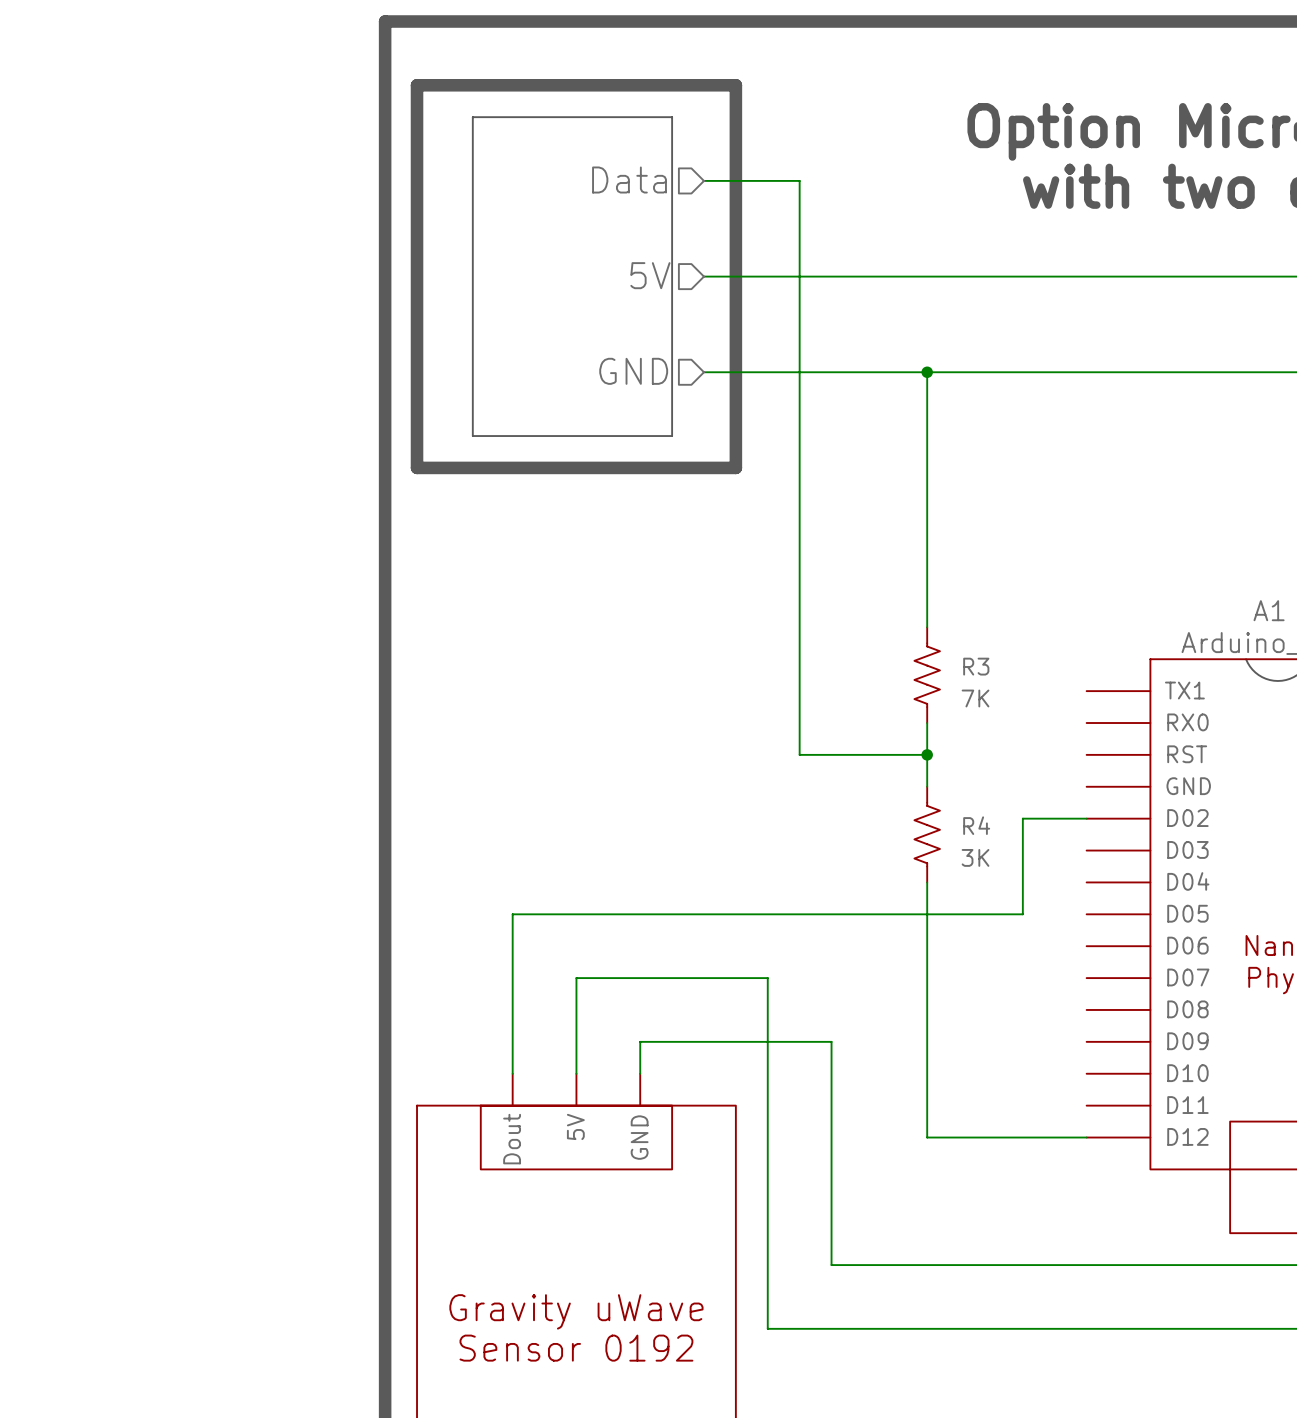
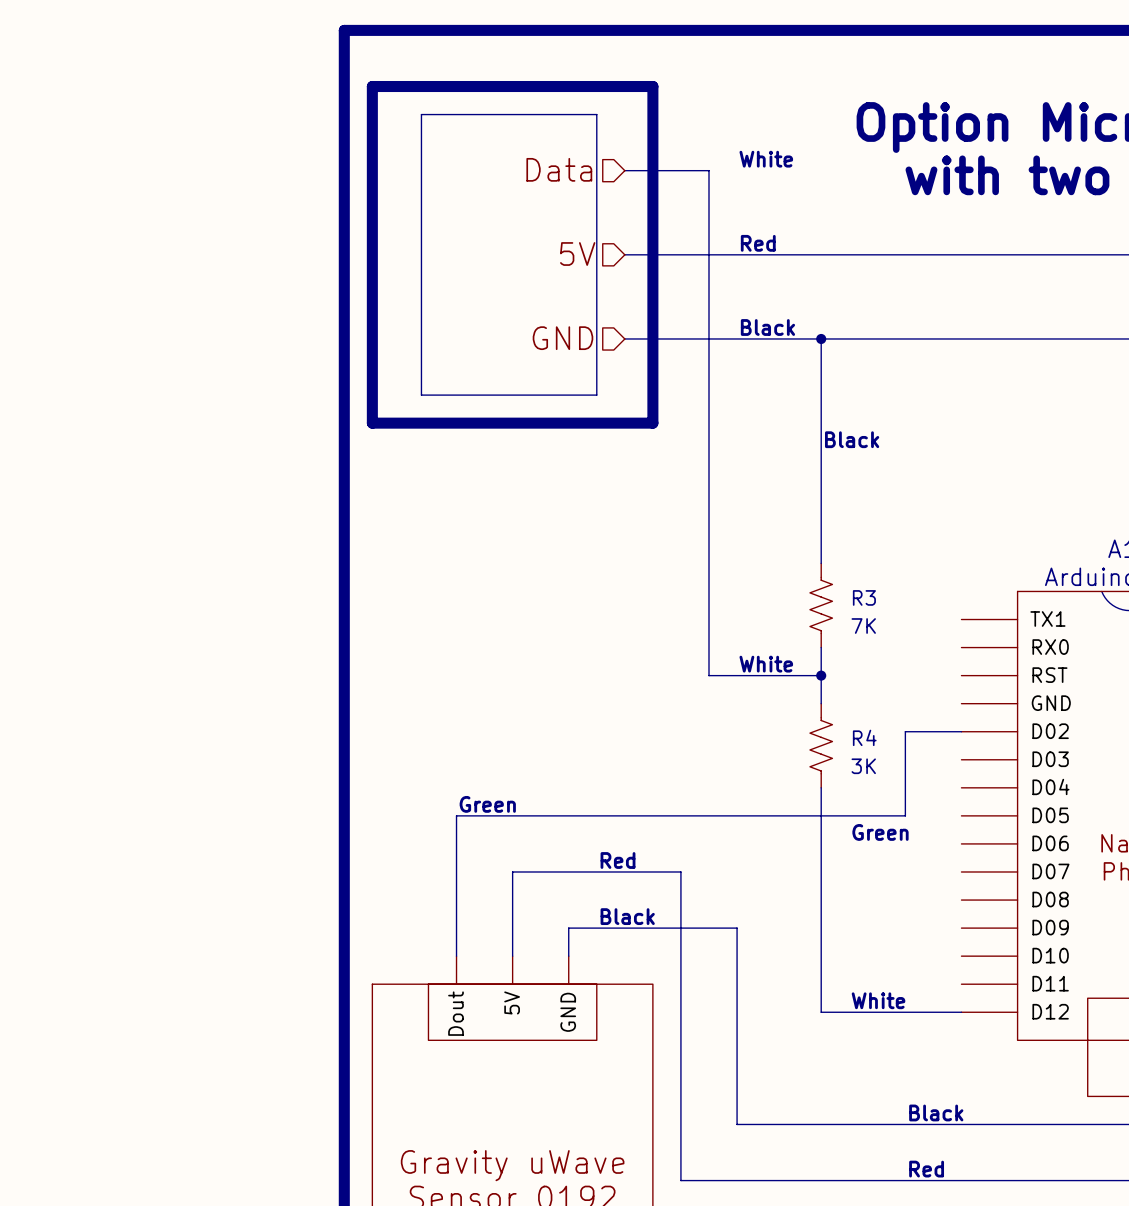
text: none -> White (766, 159)
text: none -> Red (758, 243)
text: none -> Black (767, 327)
text: none -> Black (852, 439)
text: none -> White (766, 664)
text: none -> Green (487, 804)
text: none -> Green (880, 832)
text: none -> Red (618, 860)
text: none -> Black (627, 916)
text: none -> White (878, 1000)
text: none -> Black (936, 1112)
text: none -> Red (926, 1169)

